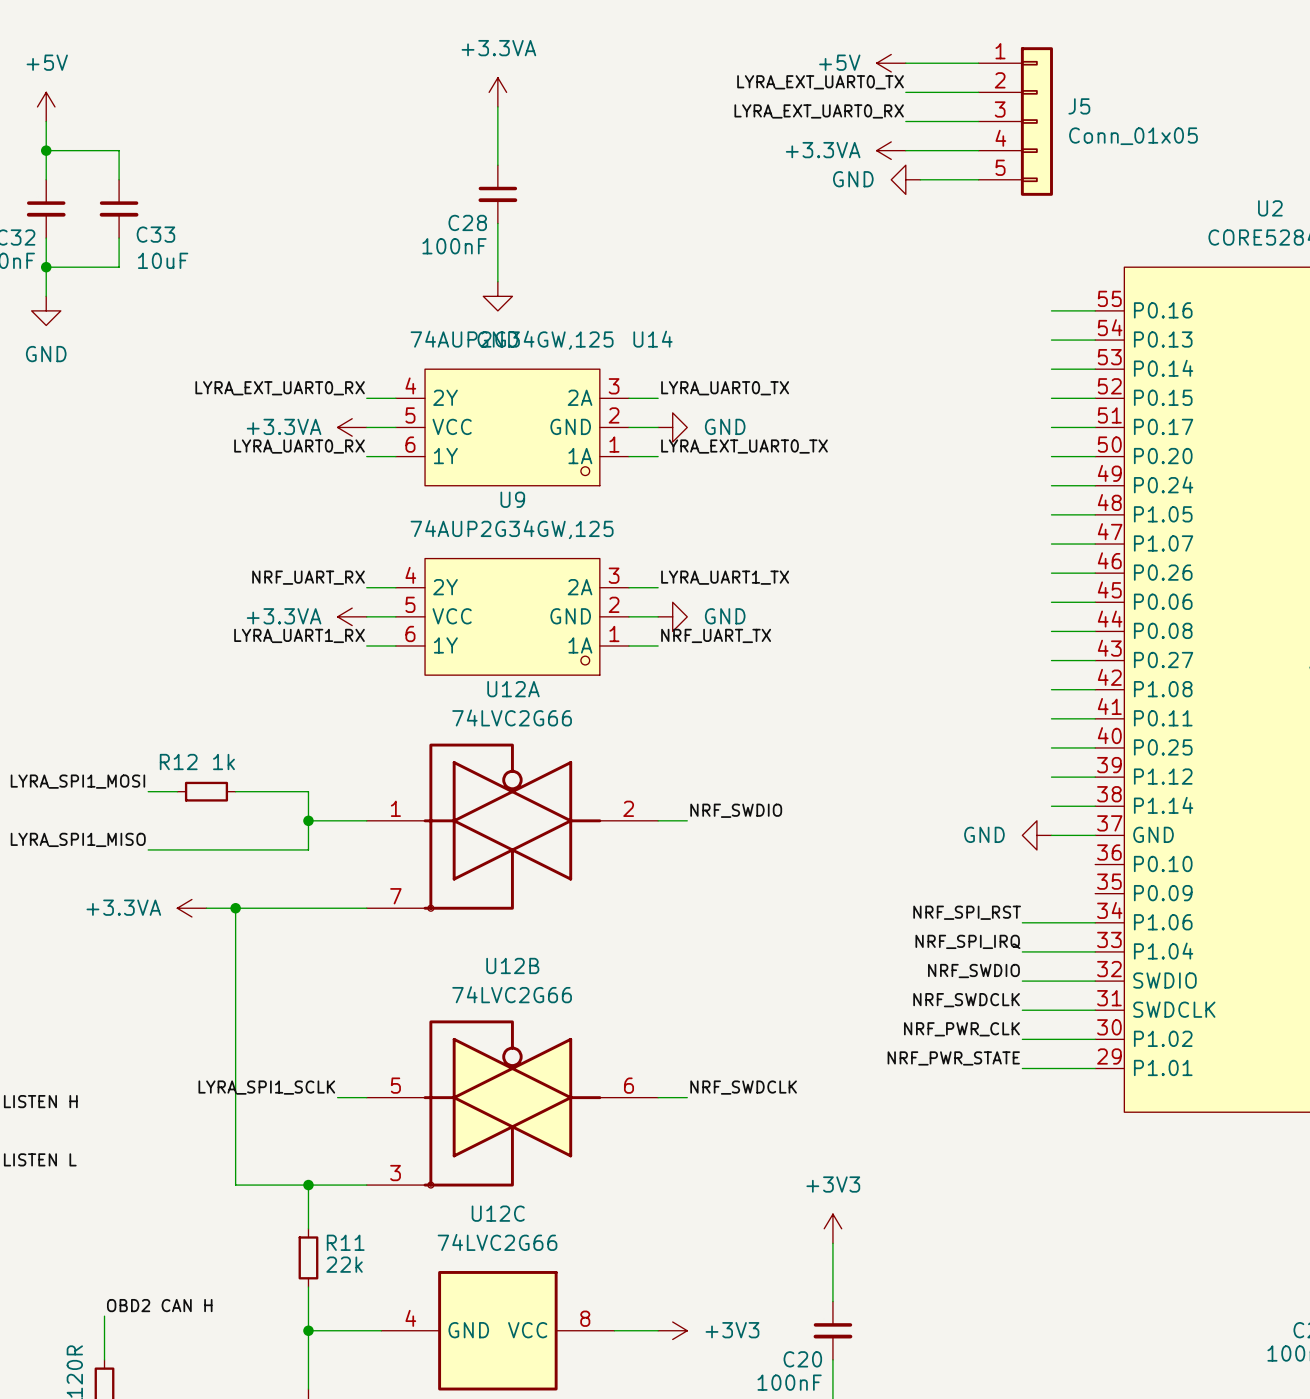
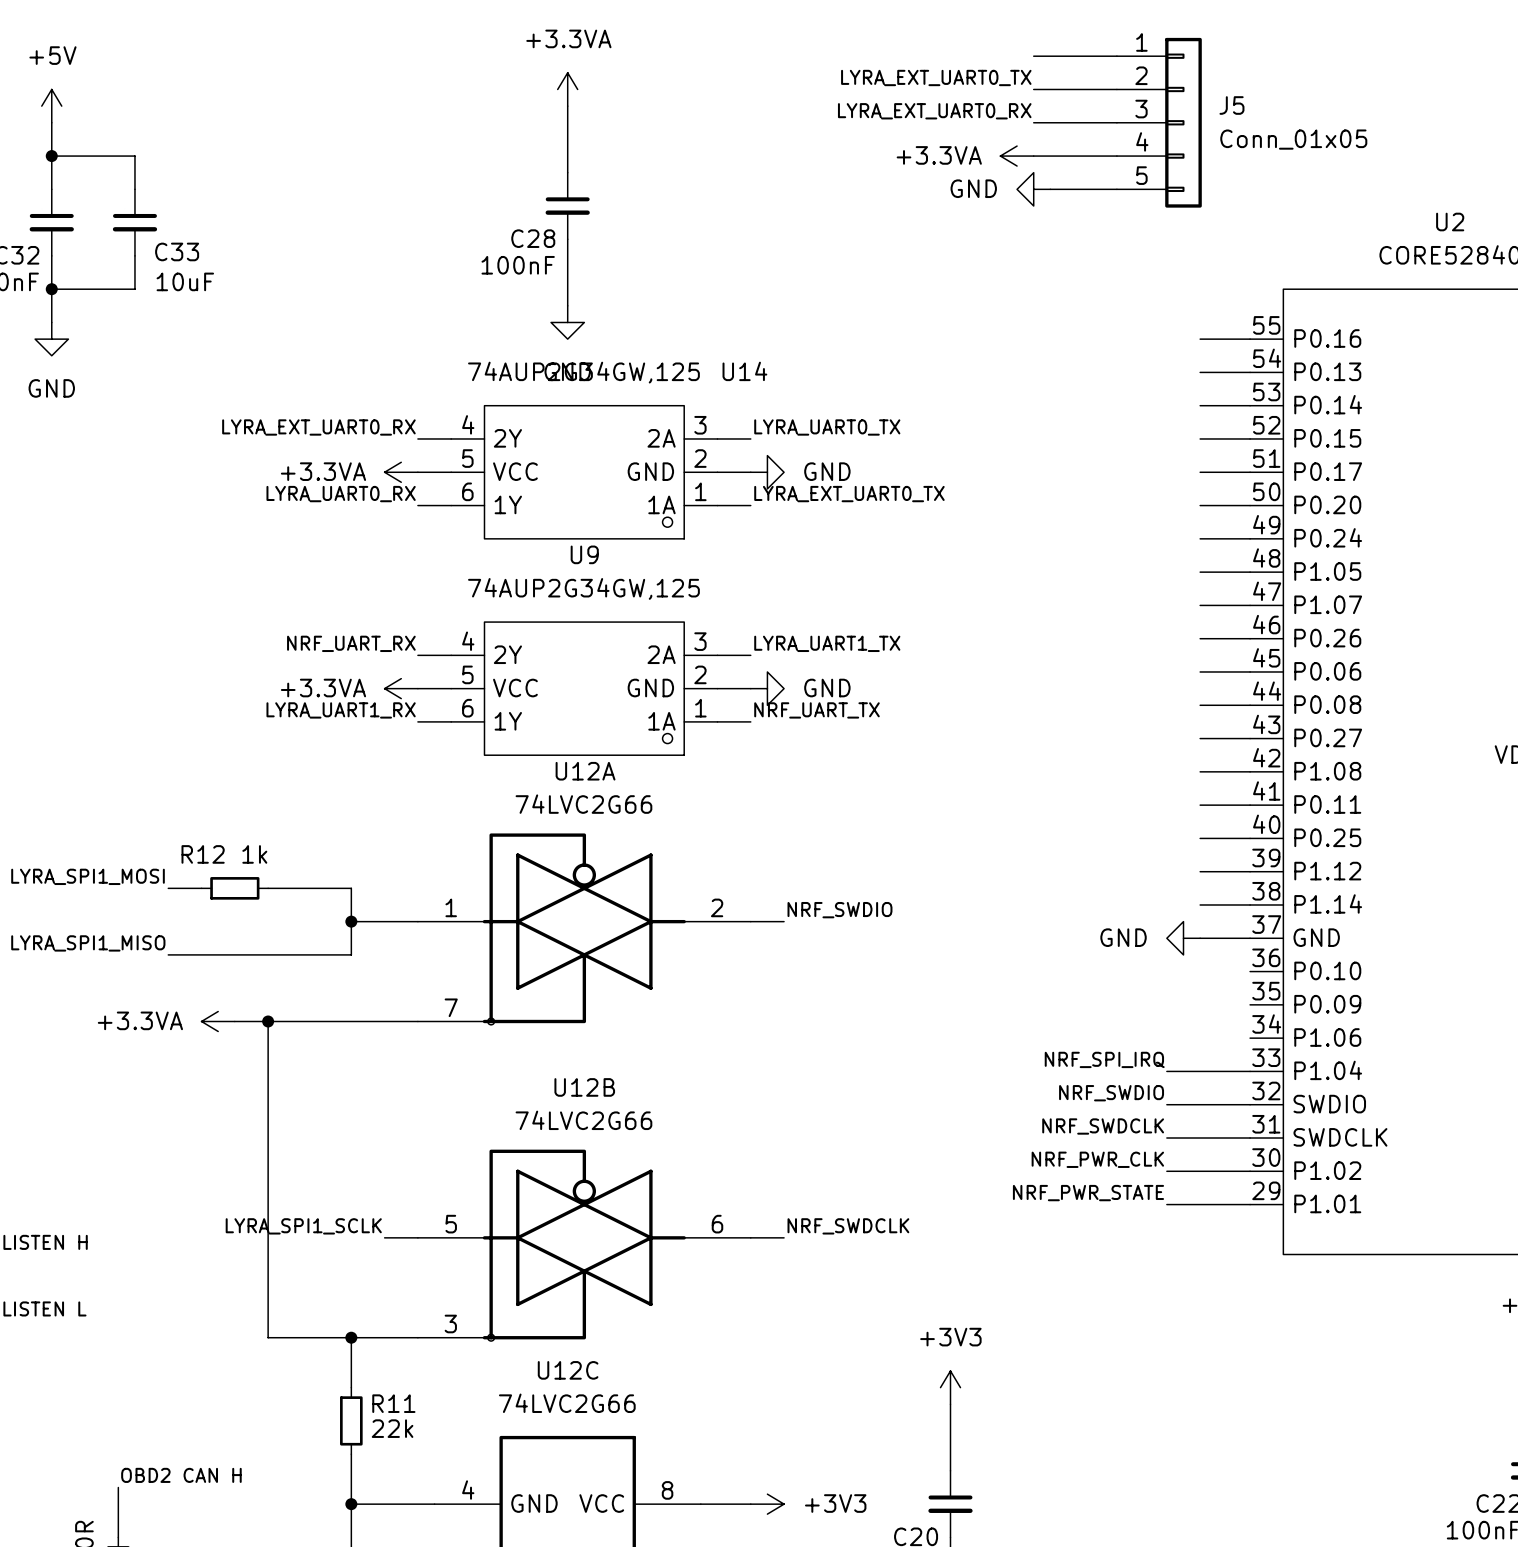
power symbol: +5V (891, 63) -> none
label: NRF_SPI_RST (967, 912) -> none
wire: (1022, 922) (1095, 922) -> none

